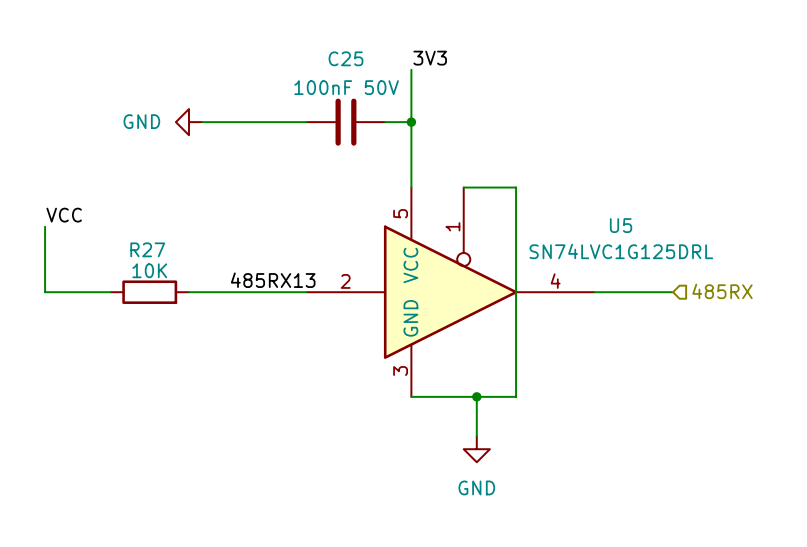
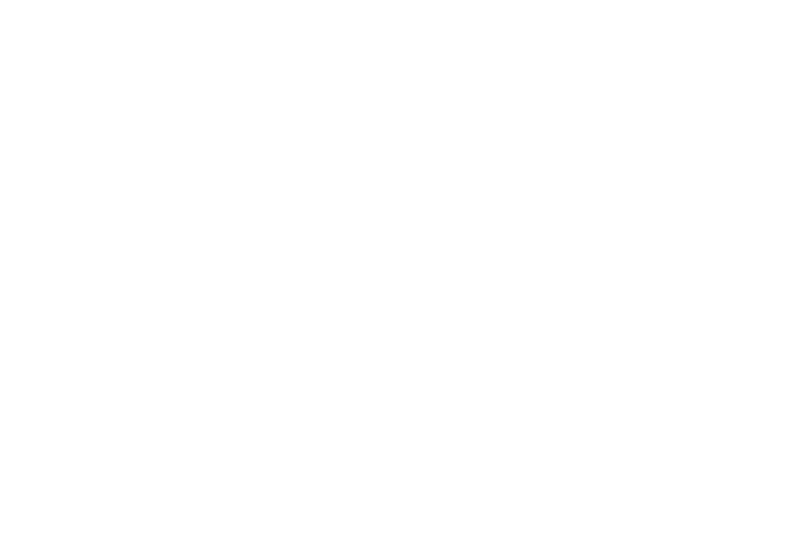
label: 3V3 (430, 58) -> none
wire: (411, 69) (411, 187) -> none
power symbol: GND (188, 122) -> none
wire: (202, 122) (306, 122) -> none
C25: 100nF 50V (345, 122) -> none
wire: (385, 122) (411, 122) -> none
junction: (411, 122) -> none
wire: (463, 187) (516, 187) (516, 396) (411, 396) -> none
label: VCC (64, 215) -> none
wire: (45, 226) (45, 292) (110, 292) -> none
label: 485RX13 (273, 280) -> none
hierarchical label: 485RX (722, 291) -> none
R27: 10K (149, 292) -> none
wire: (188, 292) (306, 292) -> none
U5: SN74LVC1G125DRL (450, 292) -> none
wire: (594, 292) (673, 292) -> none
wire: (476, 396) (476, 436) -> none
junction: (476, 396) -> none
power symbol: GND (476, 449) -> none

